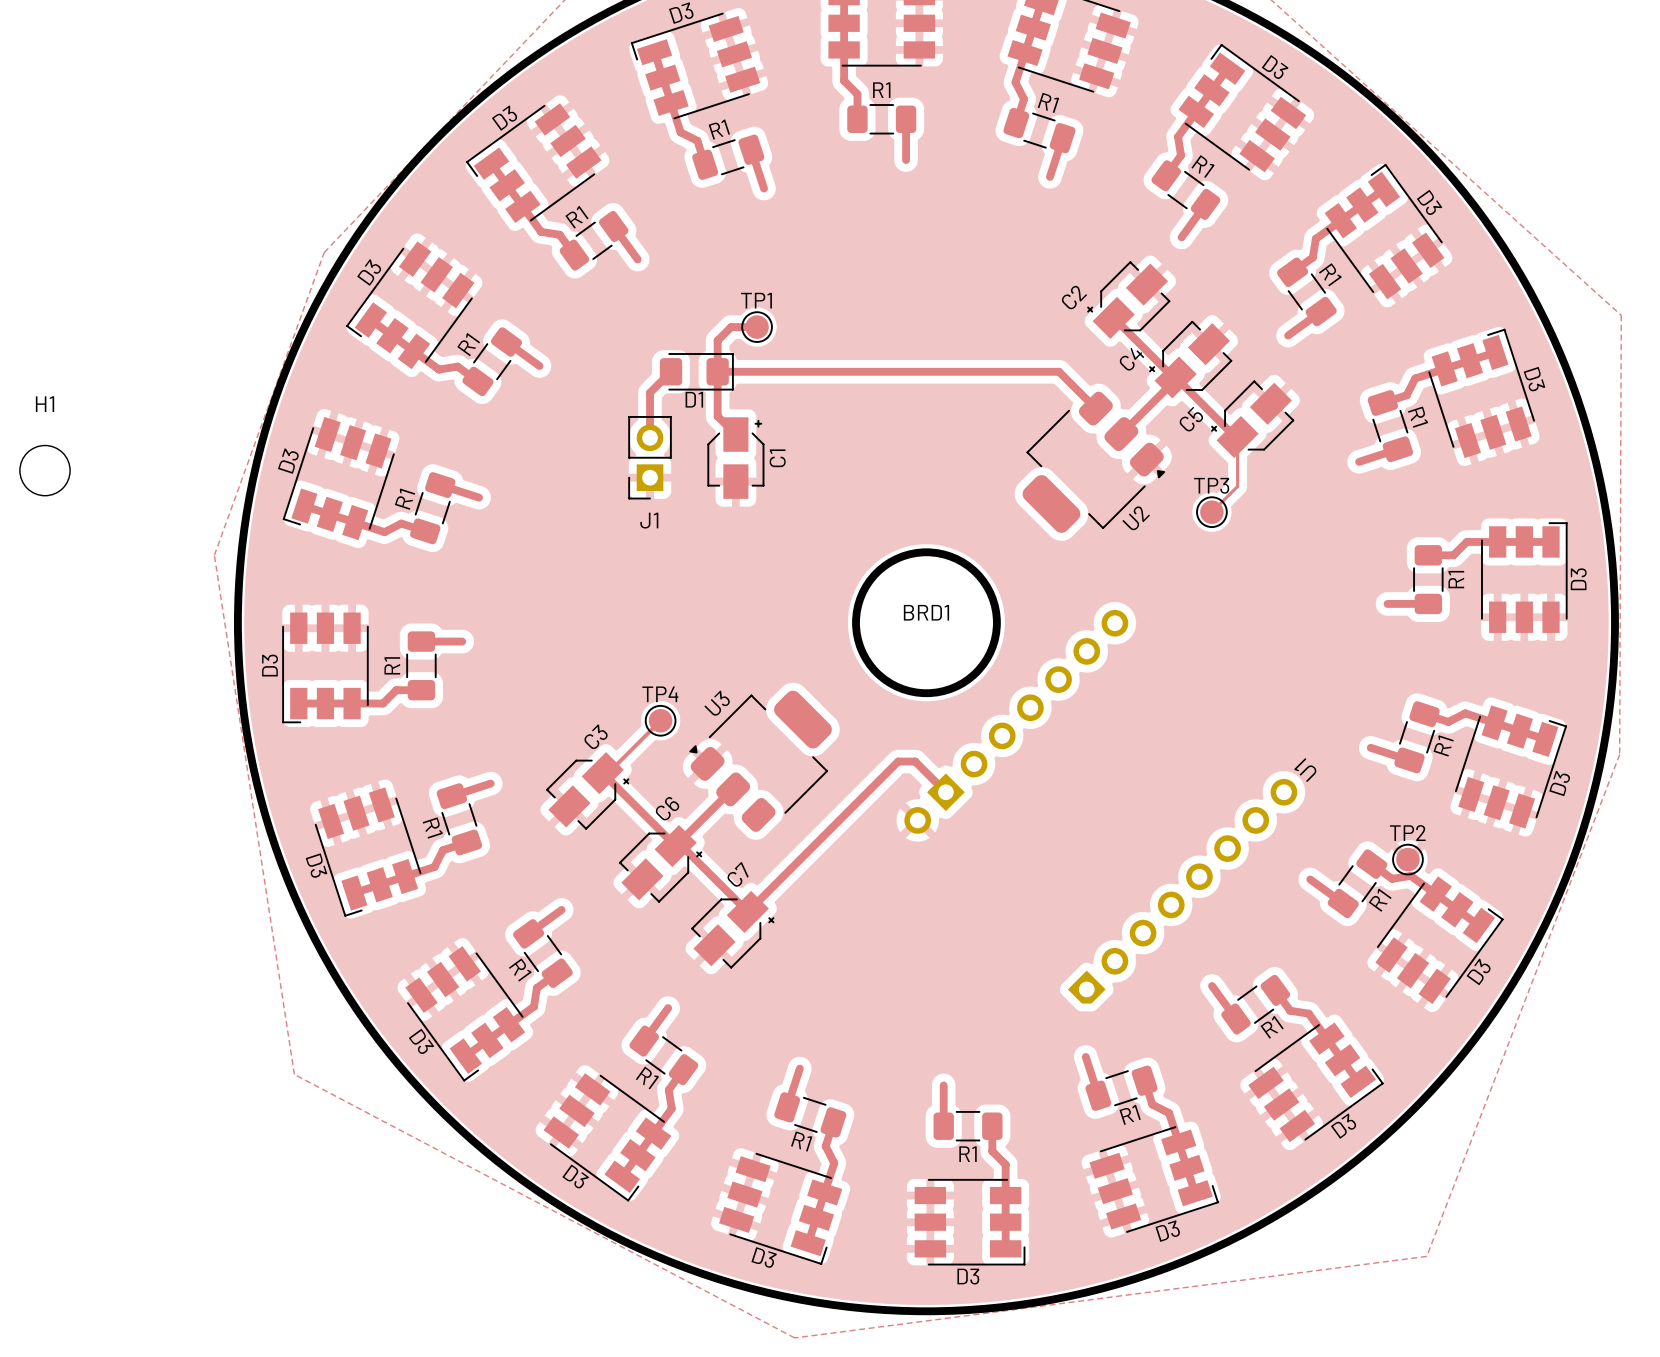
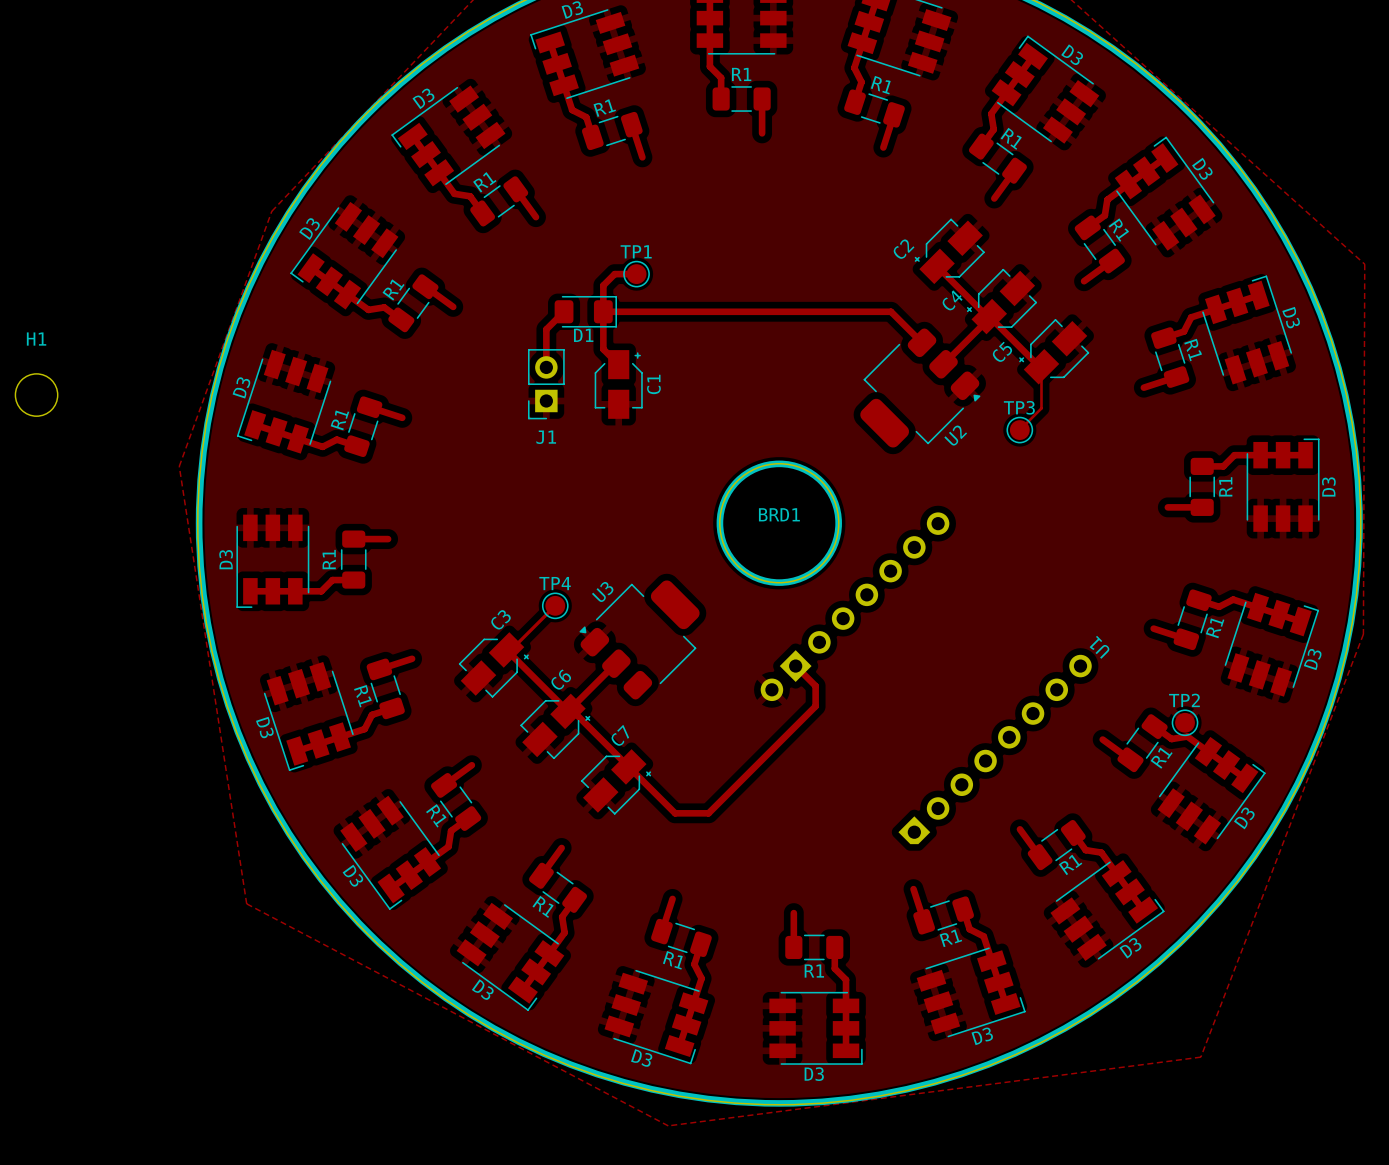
track: (945, 792) (915, 761) (898, 761) (747, 911) -> (795, 666) (815, 686) (815, 706) (708, 813) (675, 813) (628, 766)

